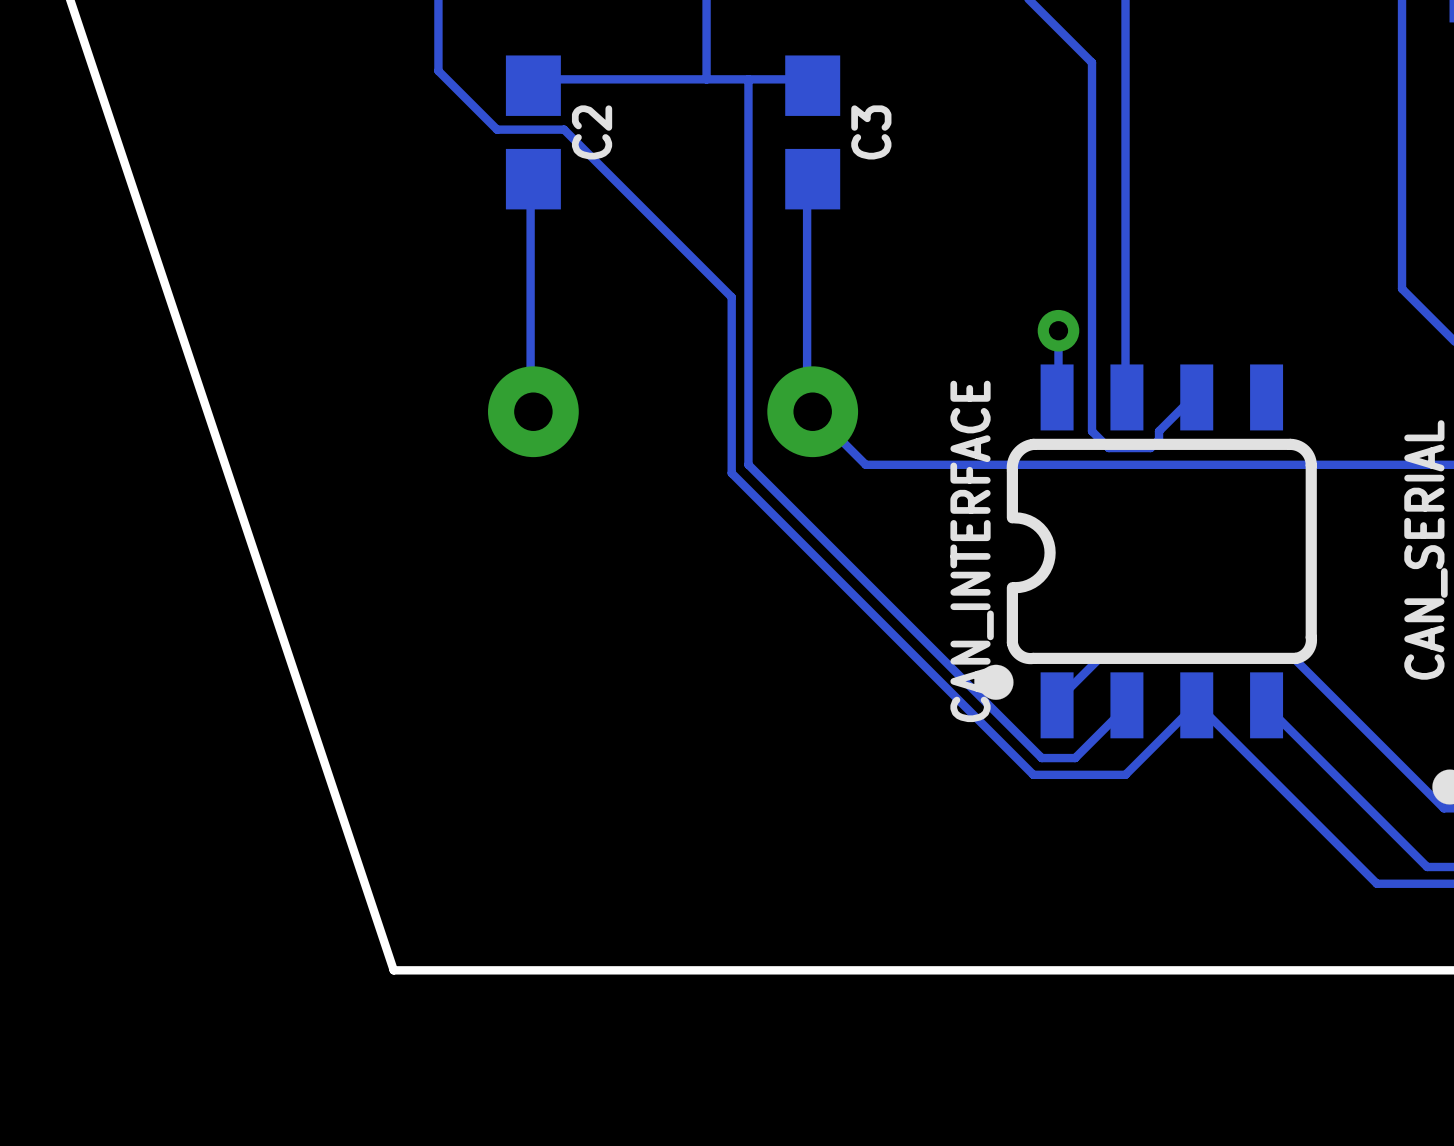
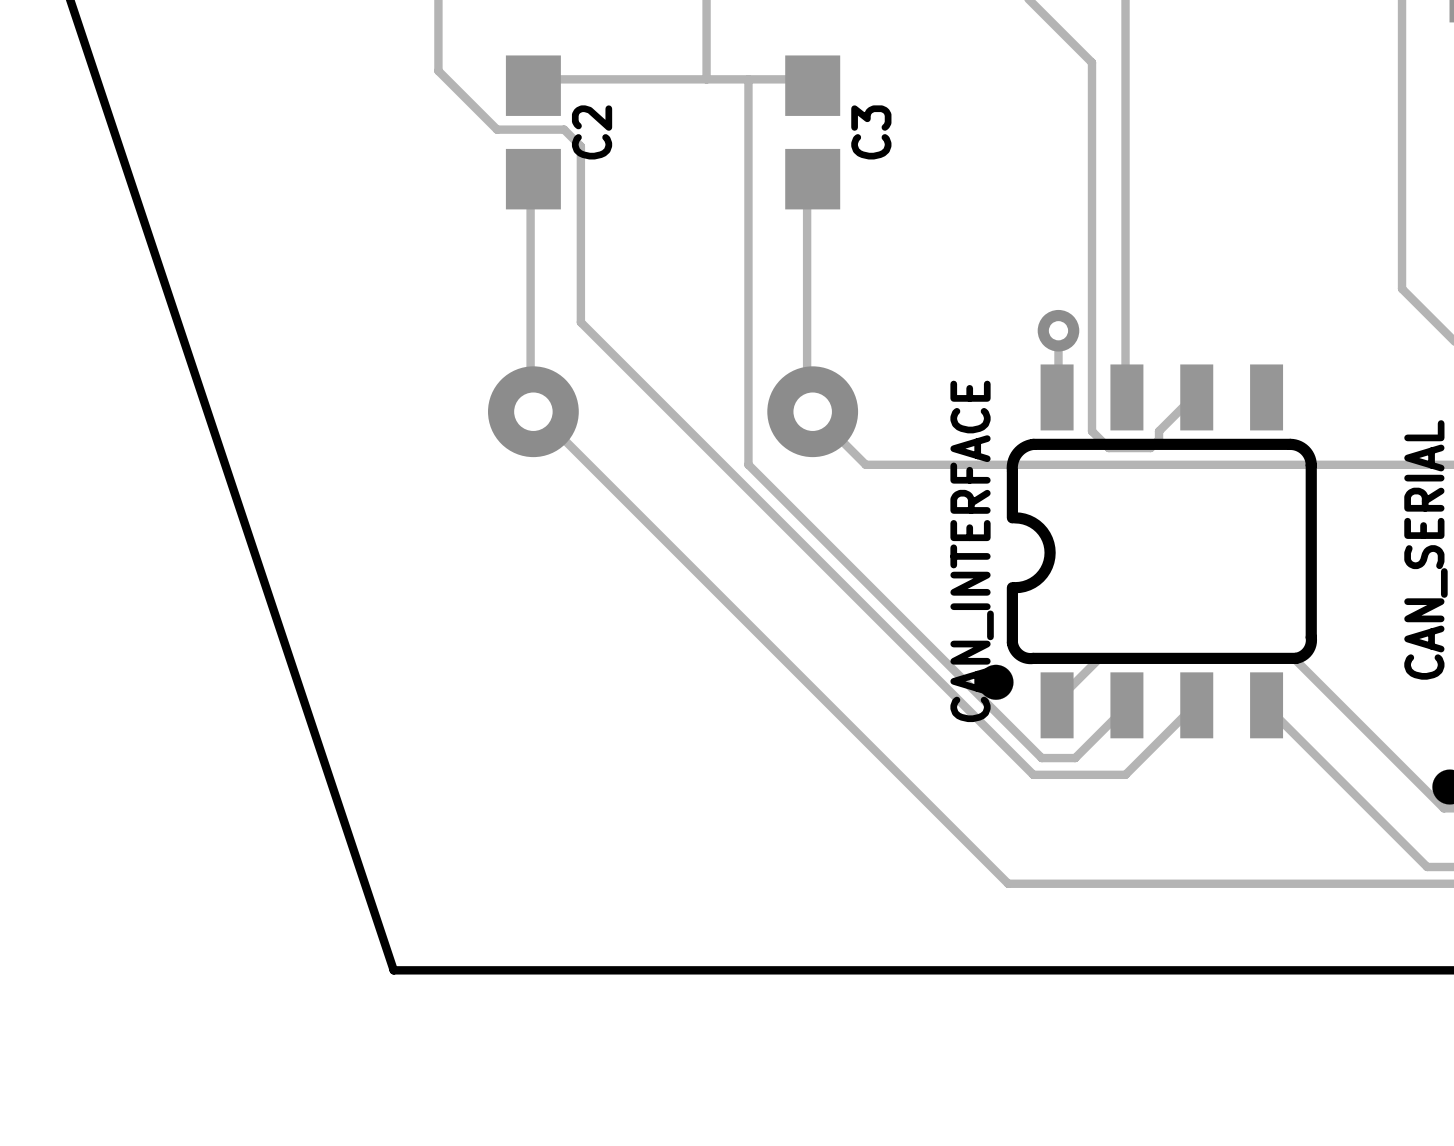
track: (580, 146) (731, 297) (731, 473) -> (580, 146) (580, 322) (731, 473)
track: (1196, 705) (1376, 883) -> (533, 411) (538, 414) (1008, 883) (1376, 883)

